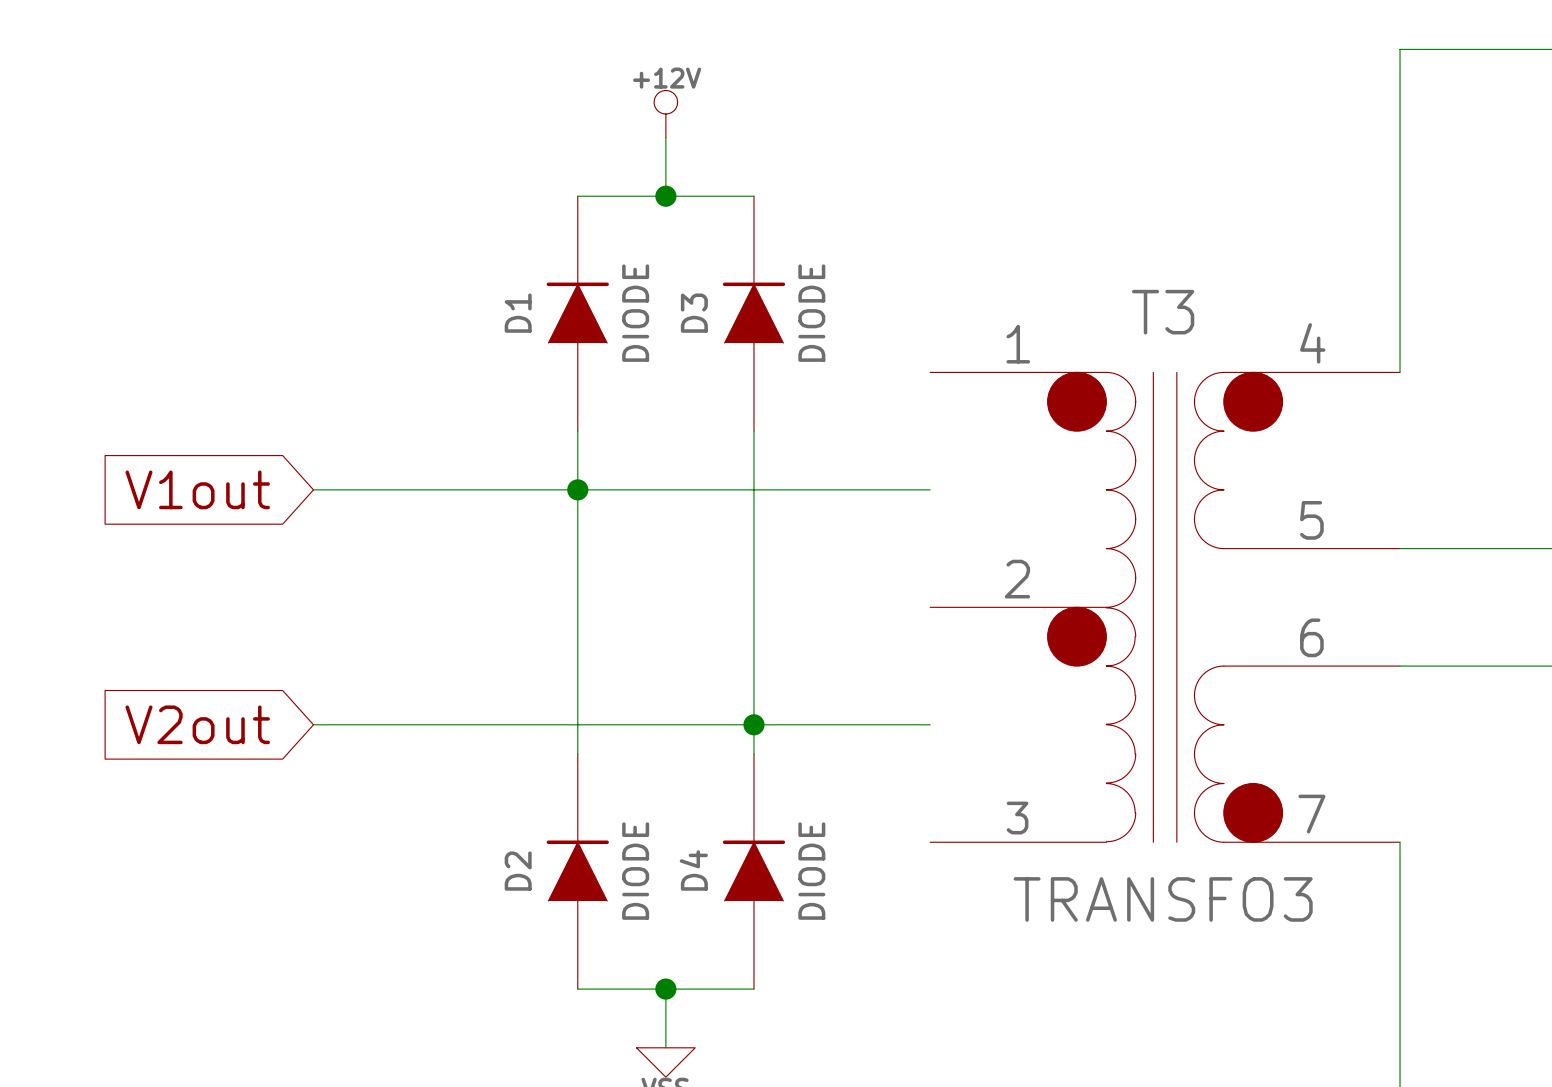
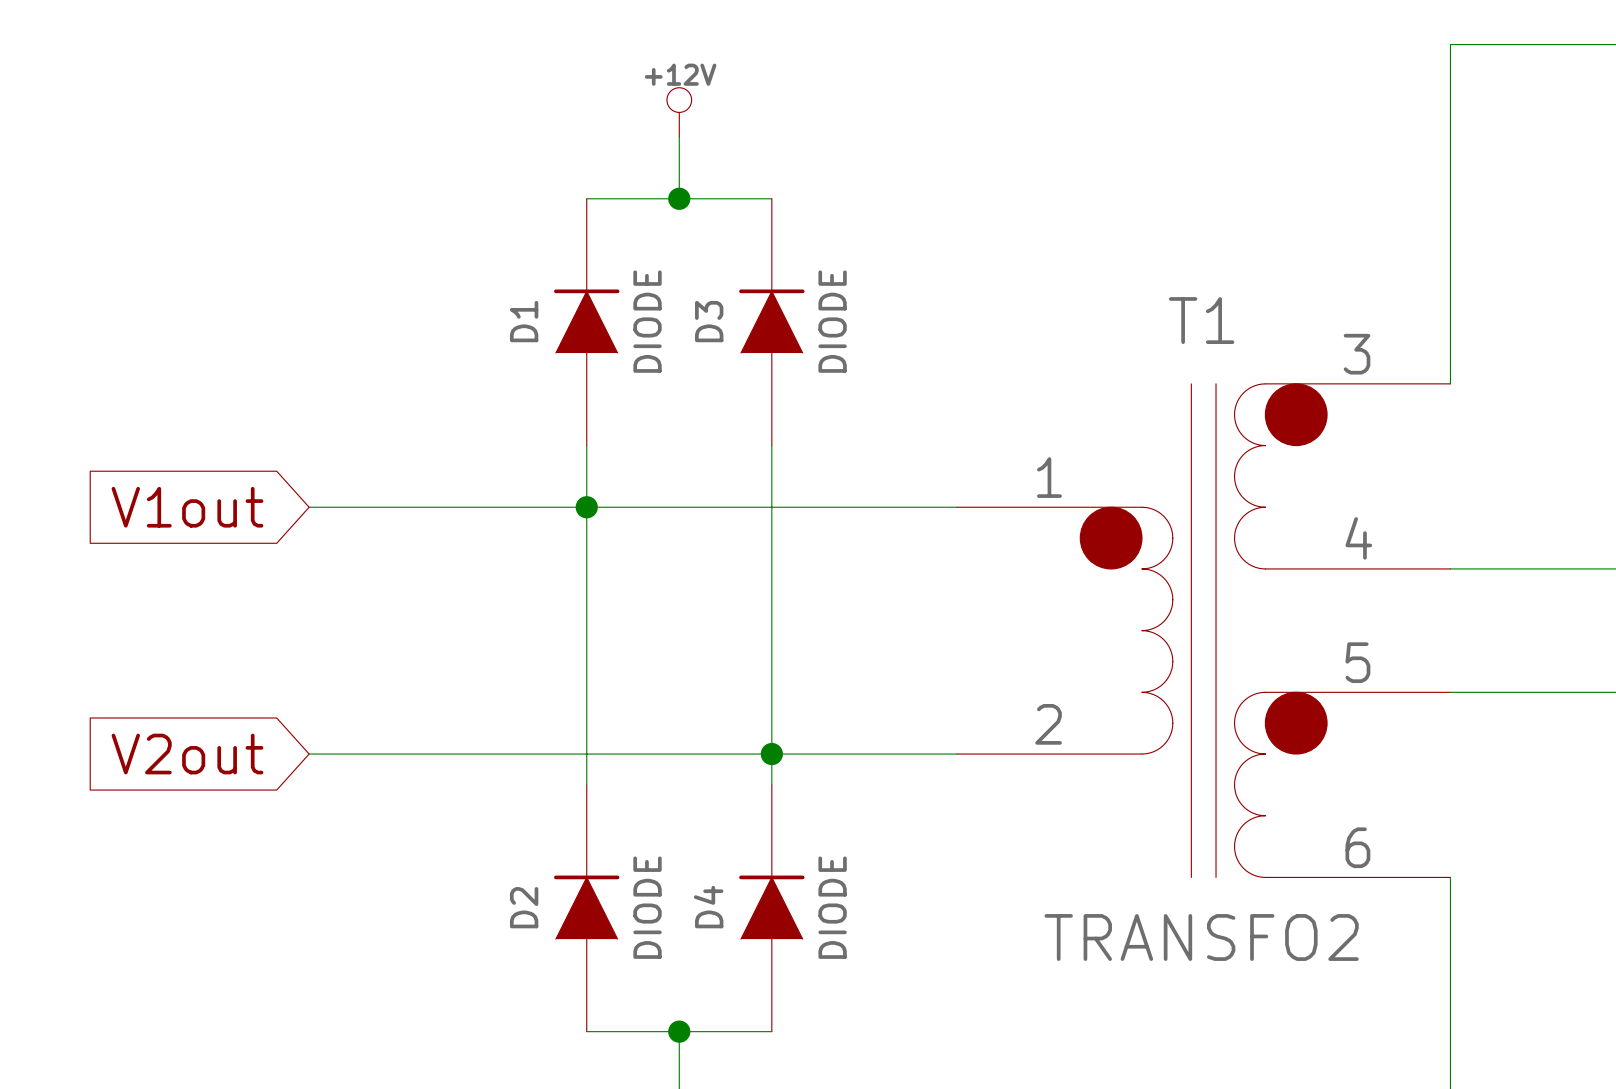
T3: TRANSFO3 (1165, 607) -> none
T1: none -> TRANSFO2 (1203, 630)

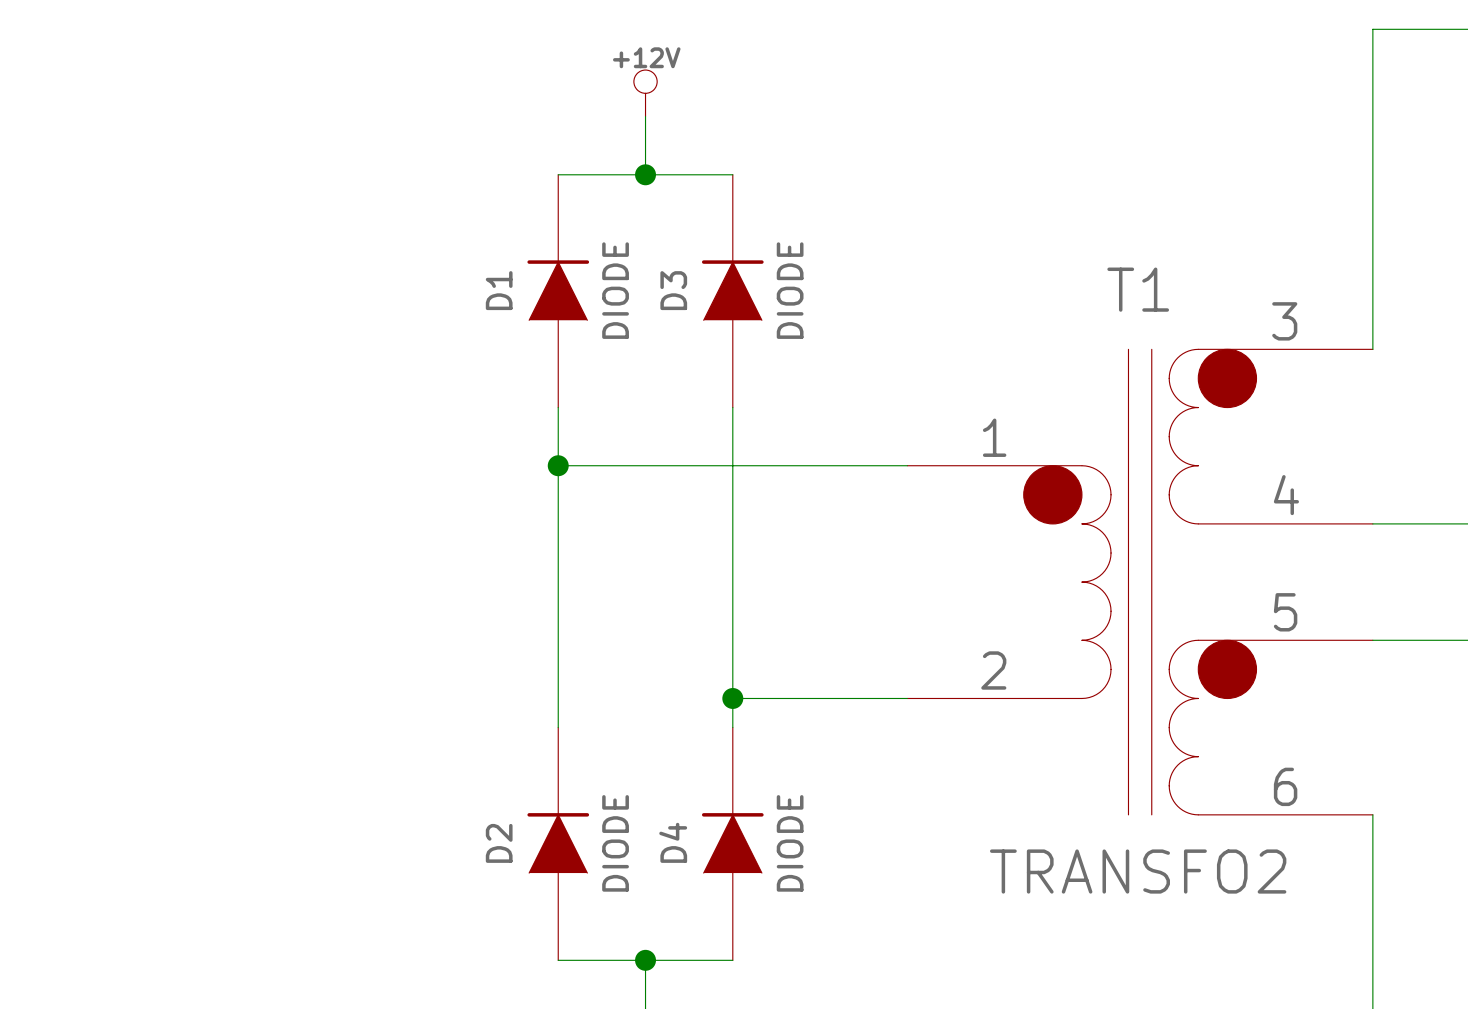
global label: V1out (187, 507) -> none
wire: (309, 507) (586, 507) -> none
global label: V2out (187, 754) -> none
wire: (309, 754) (771, 754) -> none

